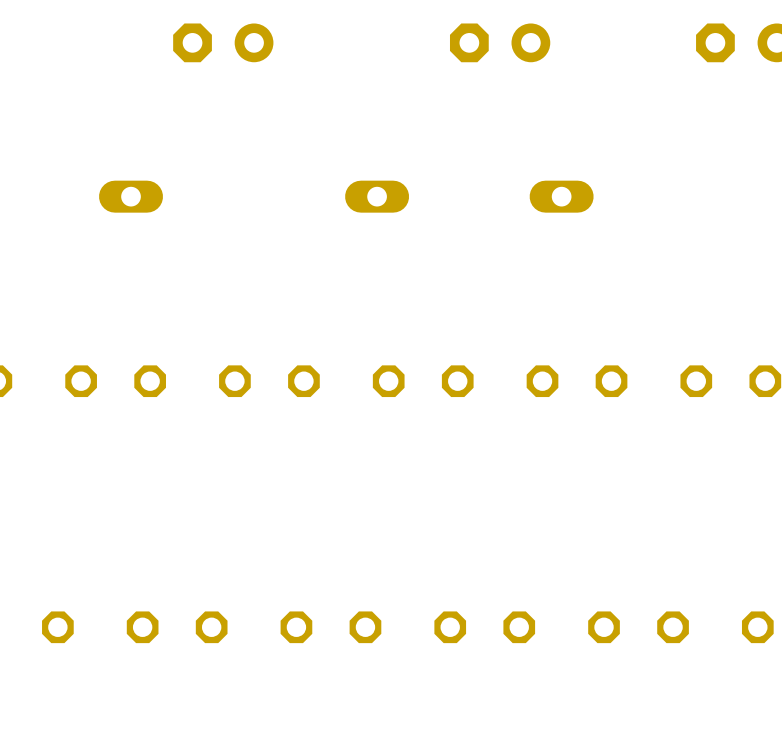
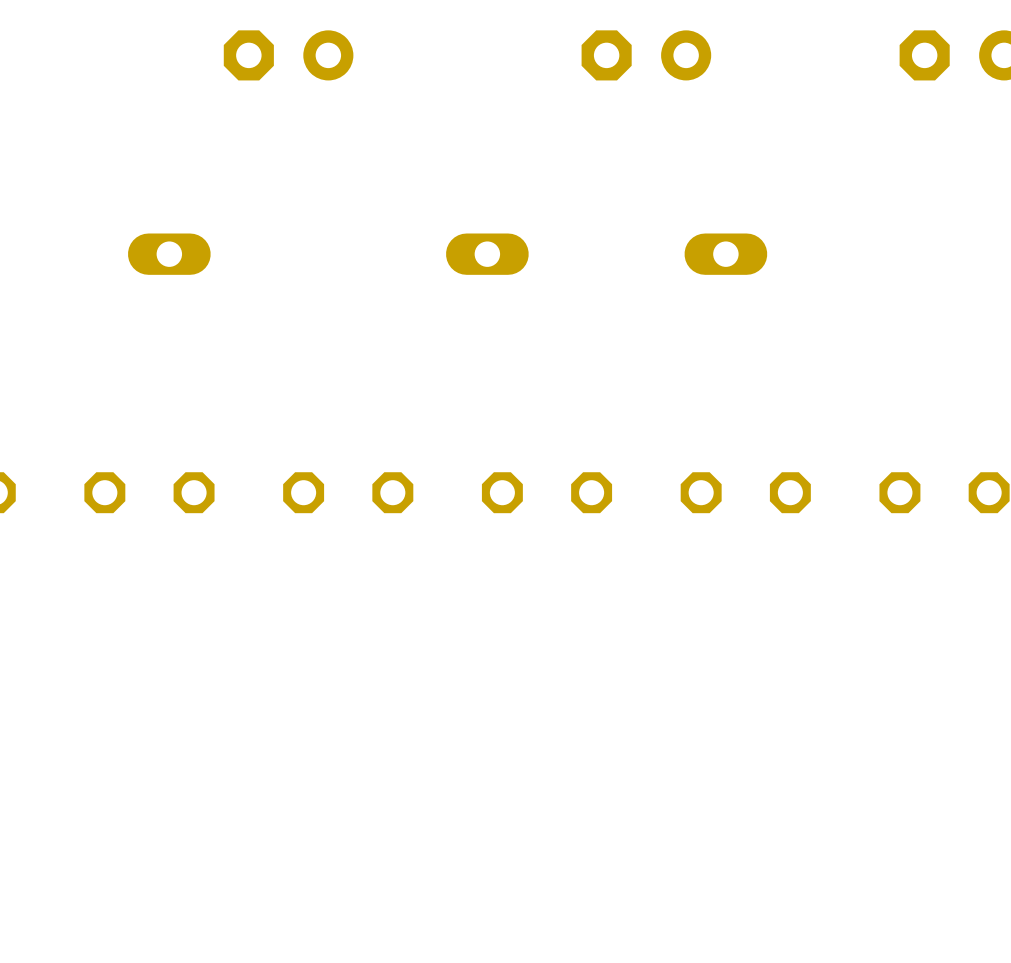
part: (100, 627) -> none
part: (254, 627) -> none
part: (407, 627) -> none
part: (561, 627) -> none
part: (715, 627) -> none

